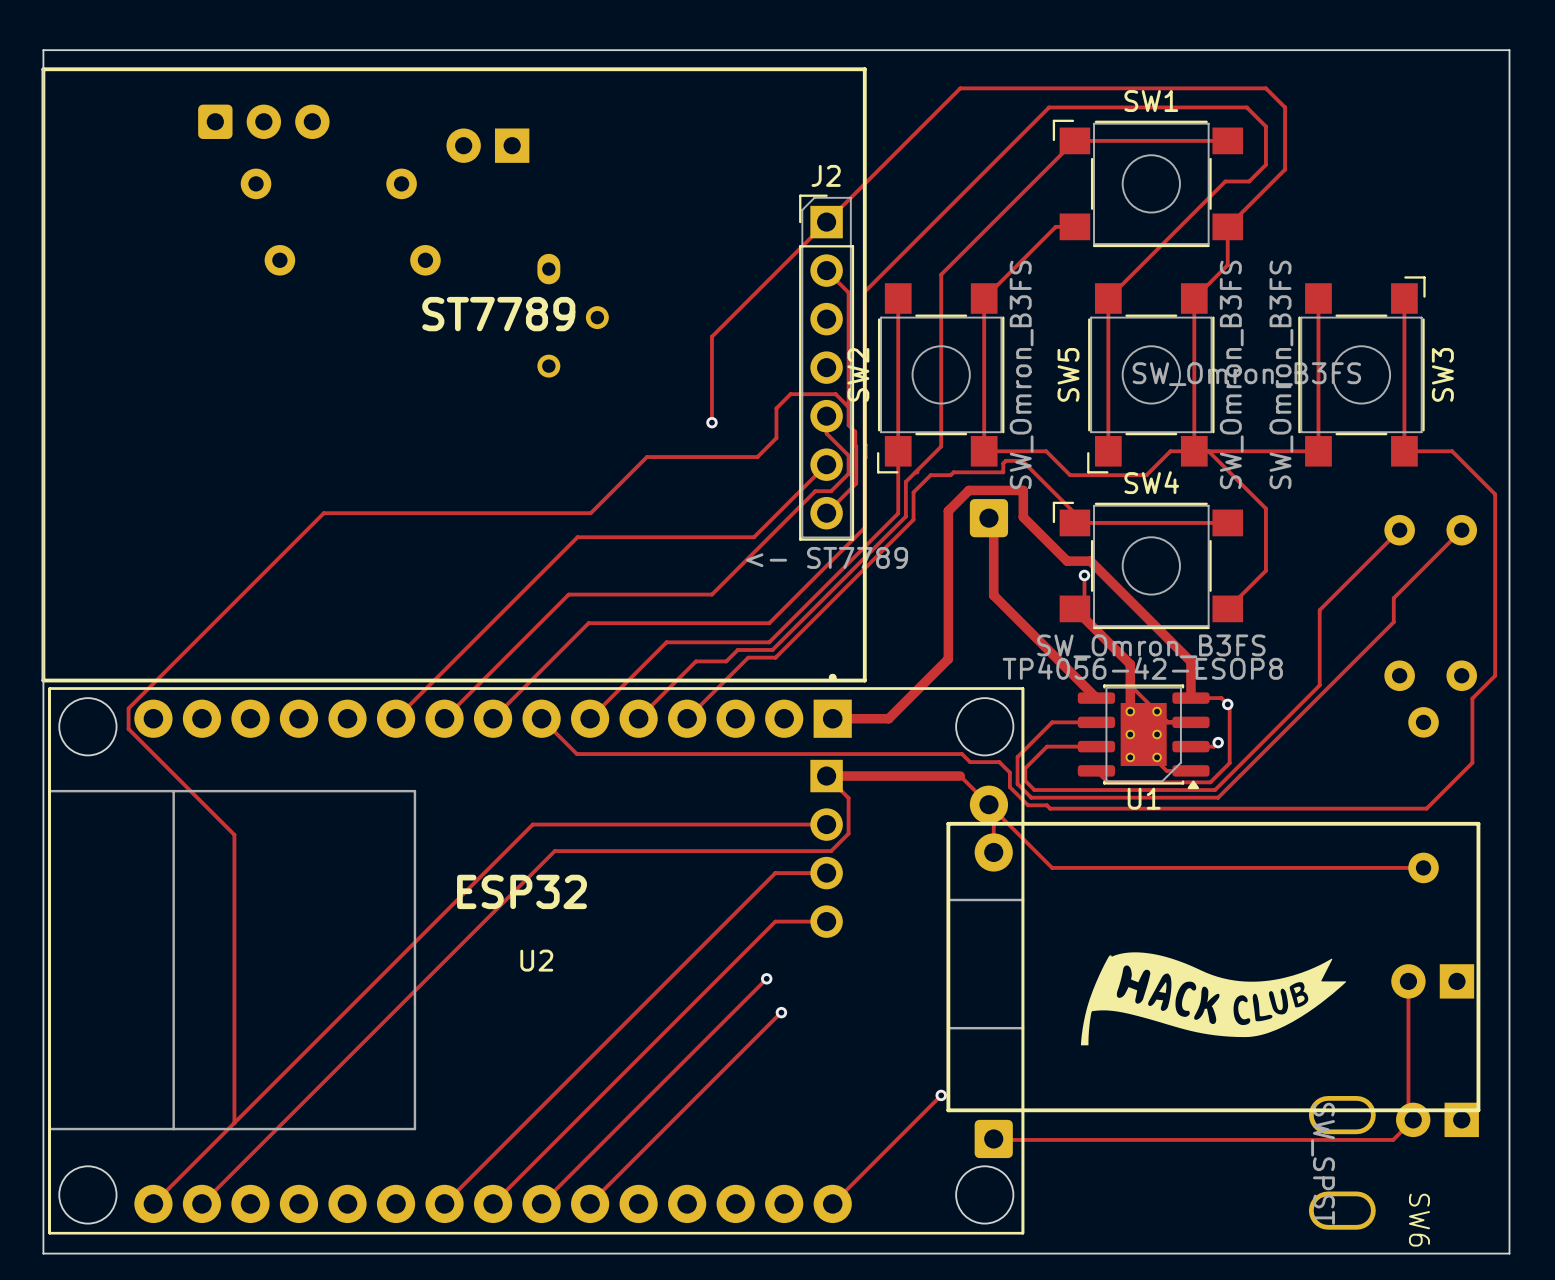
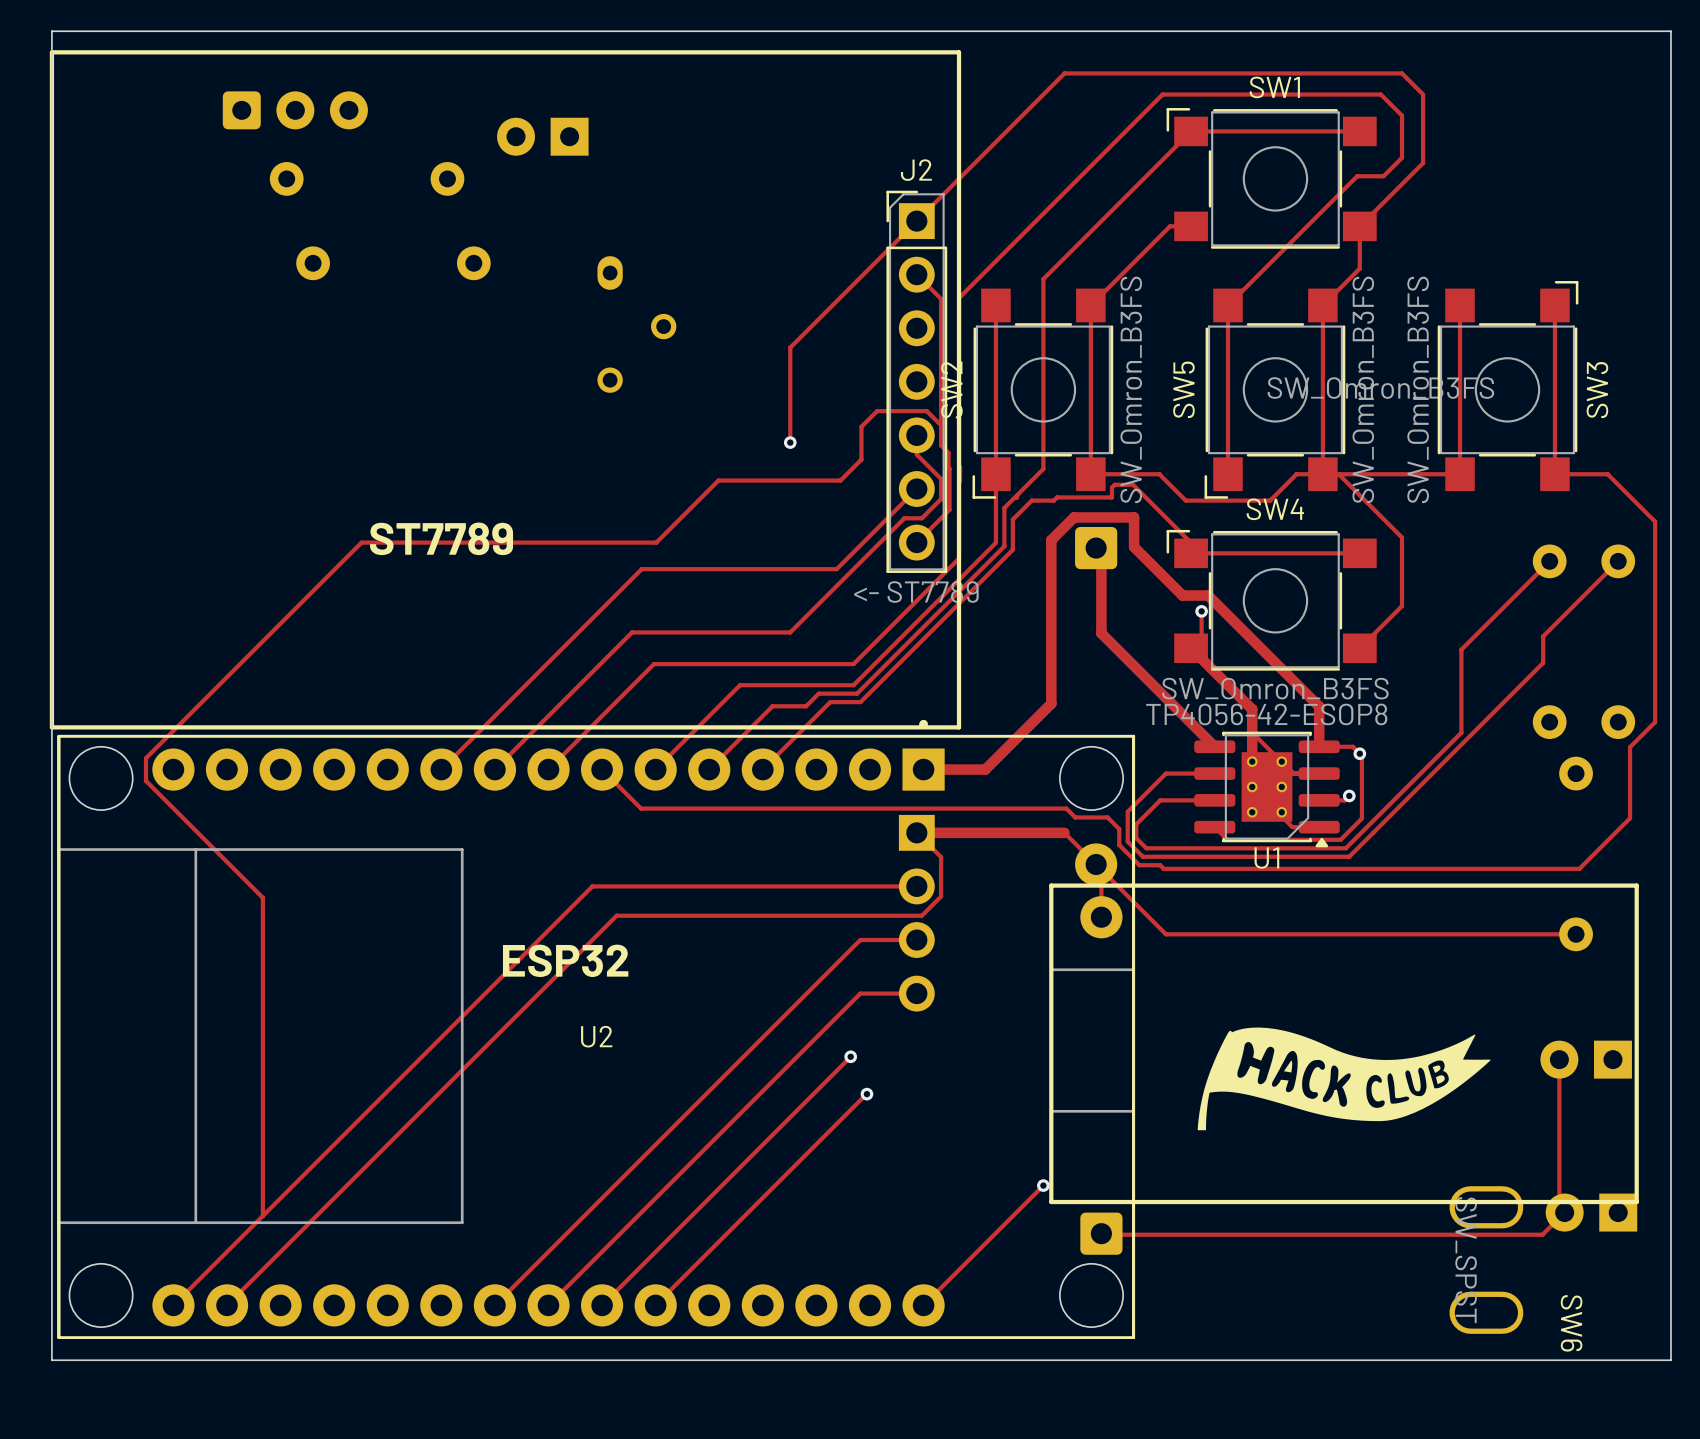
text position: ST7789 (498, 314) -> ST7789 (441, 538)

